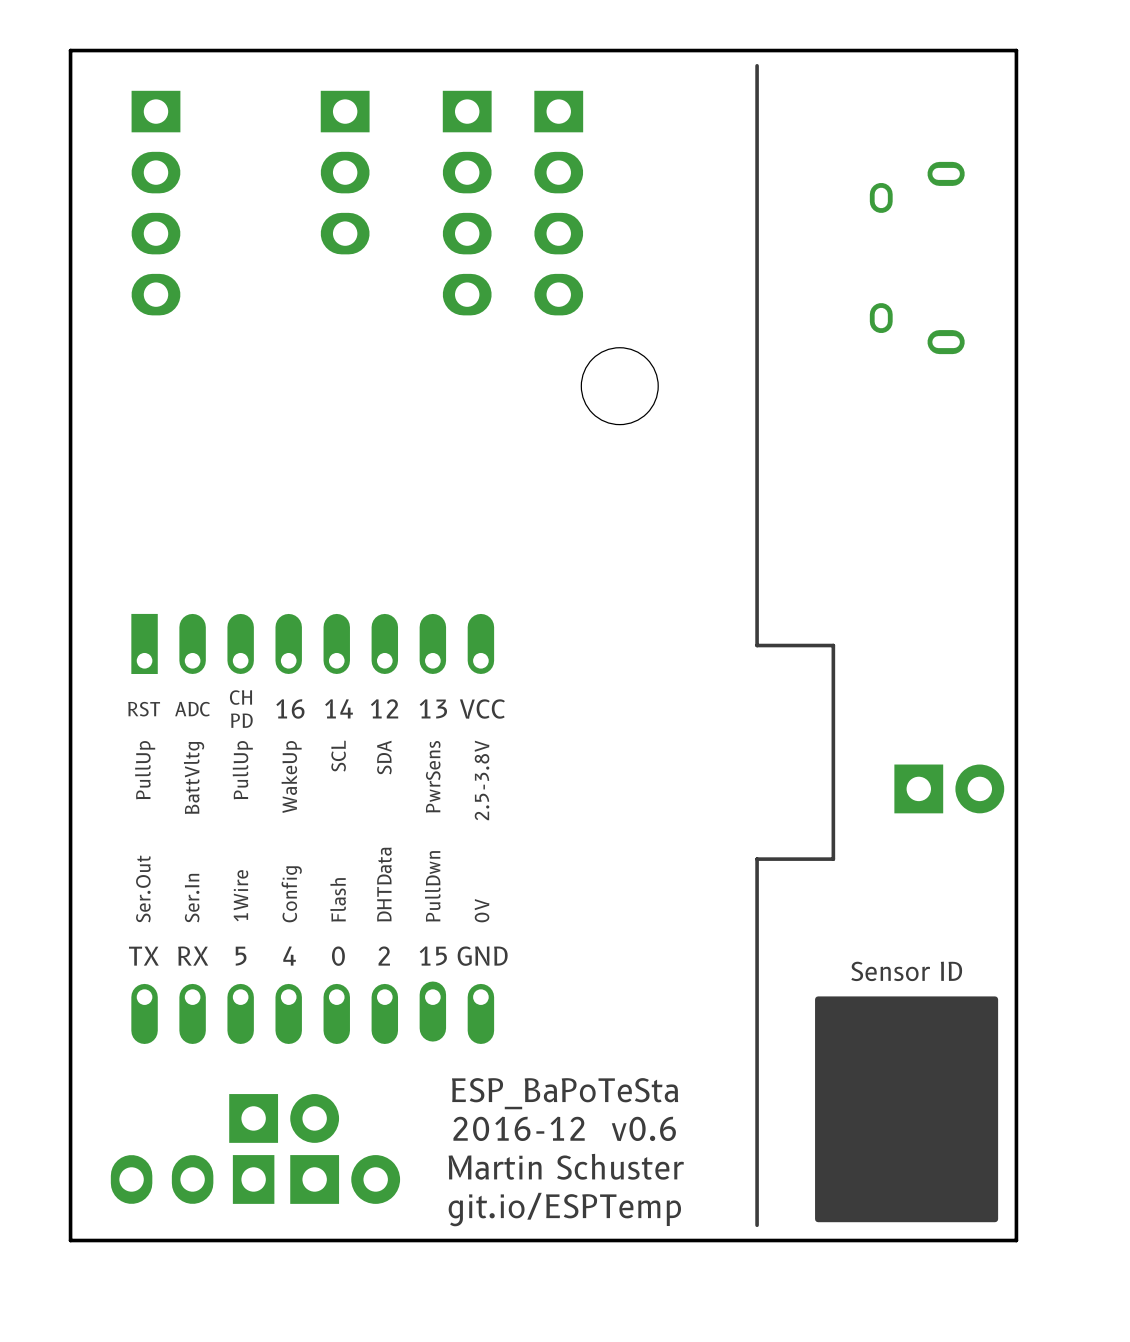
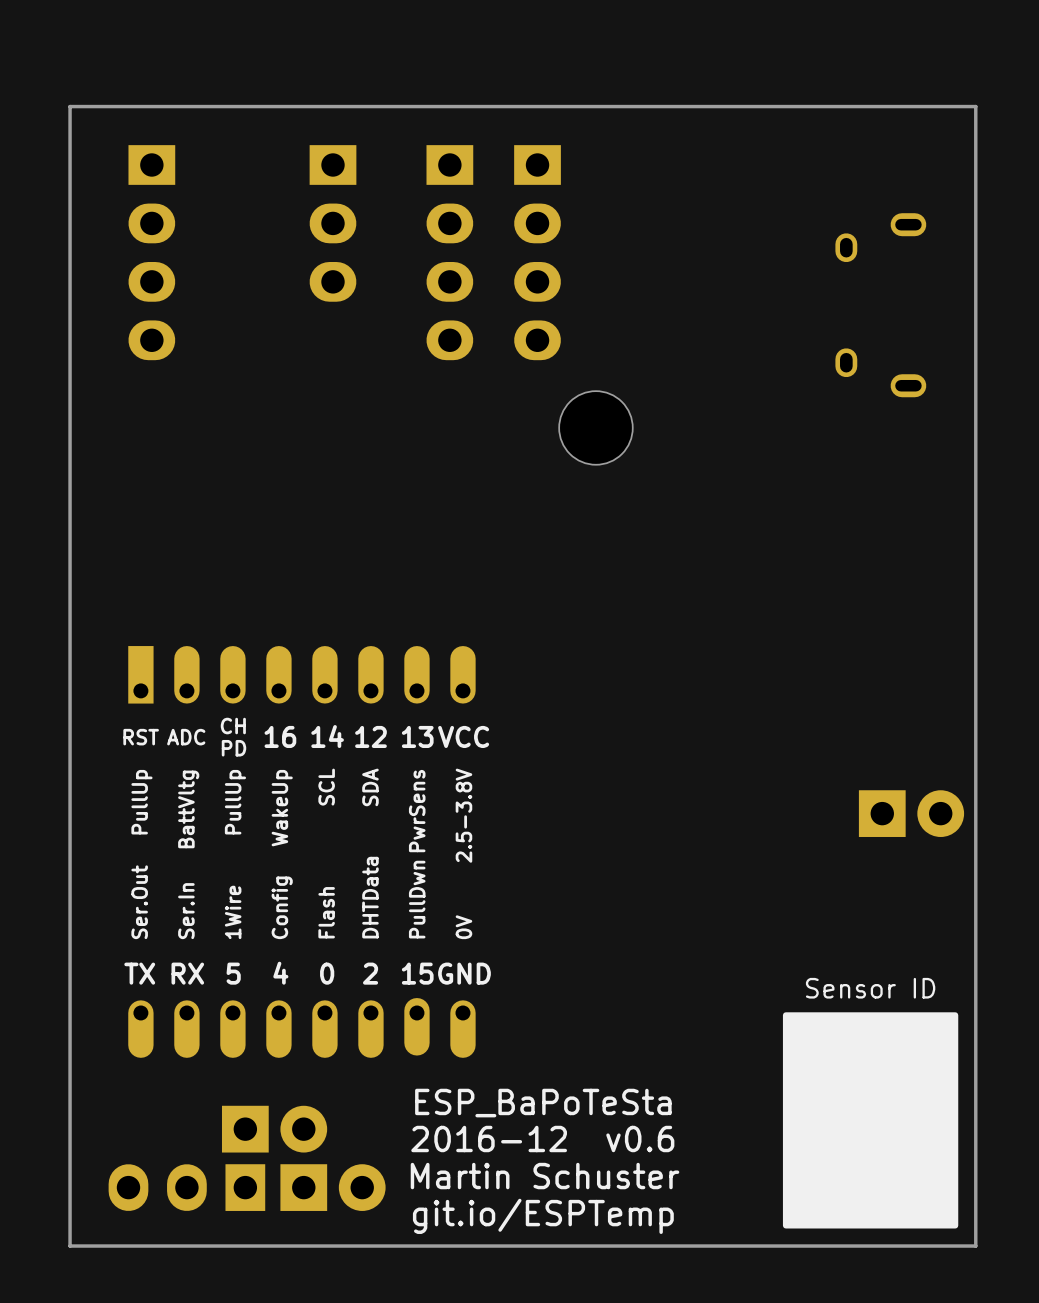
line: (757, 65) (757, 645) (833, 645) (833, 859) (757, 859) (757, 1225) -> none

